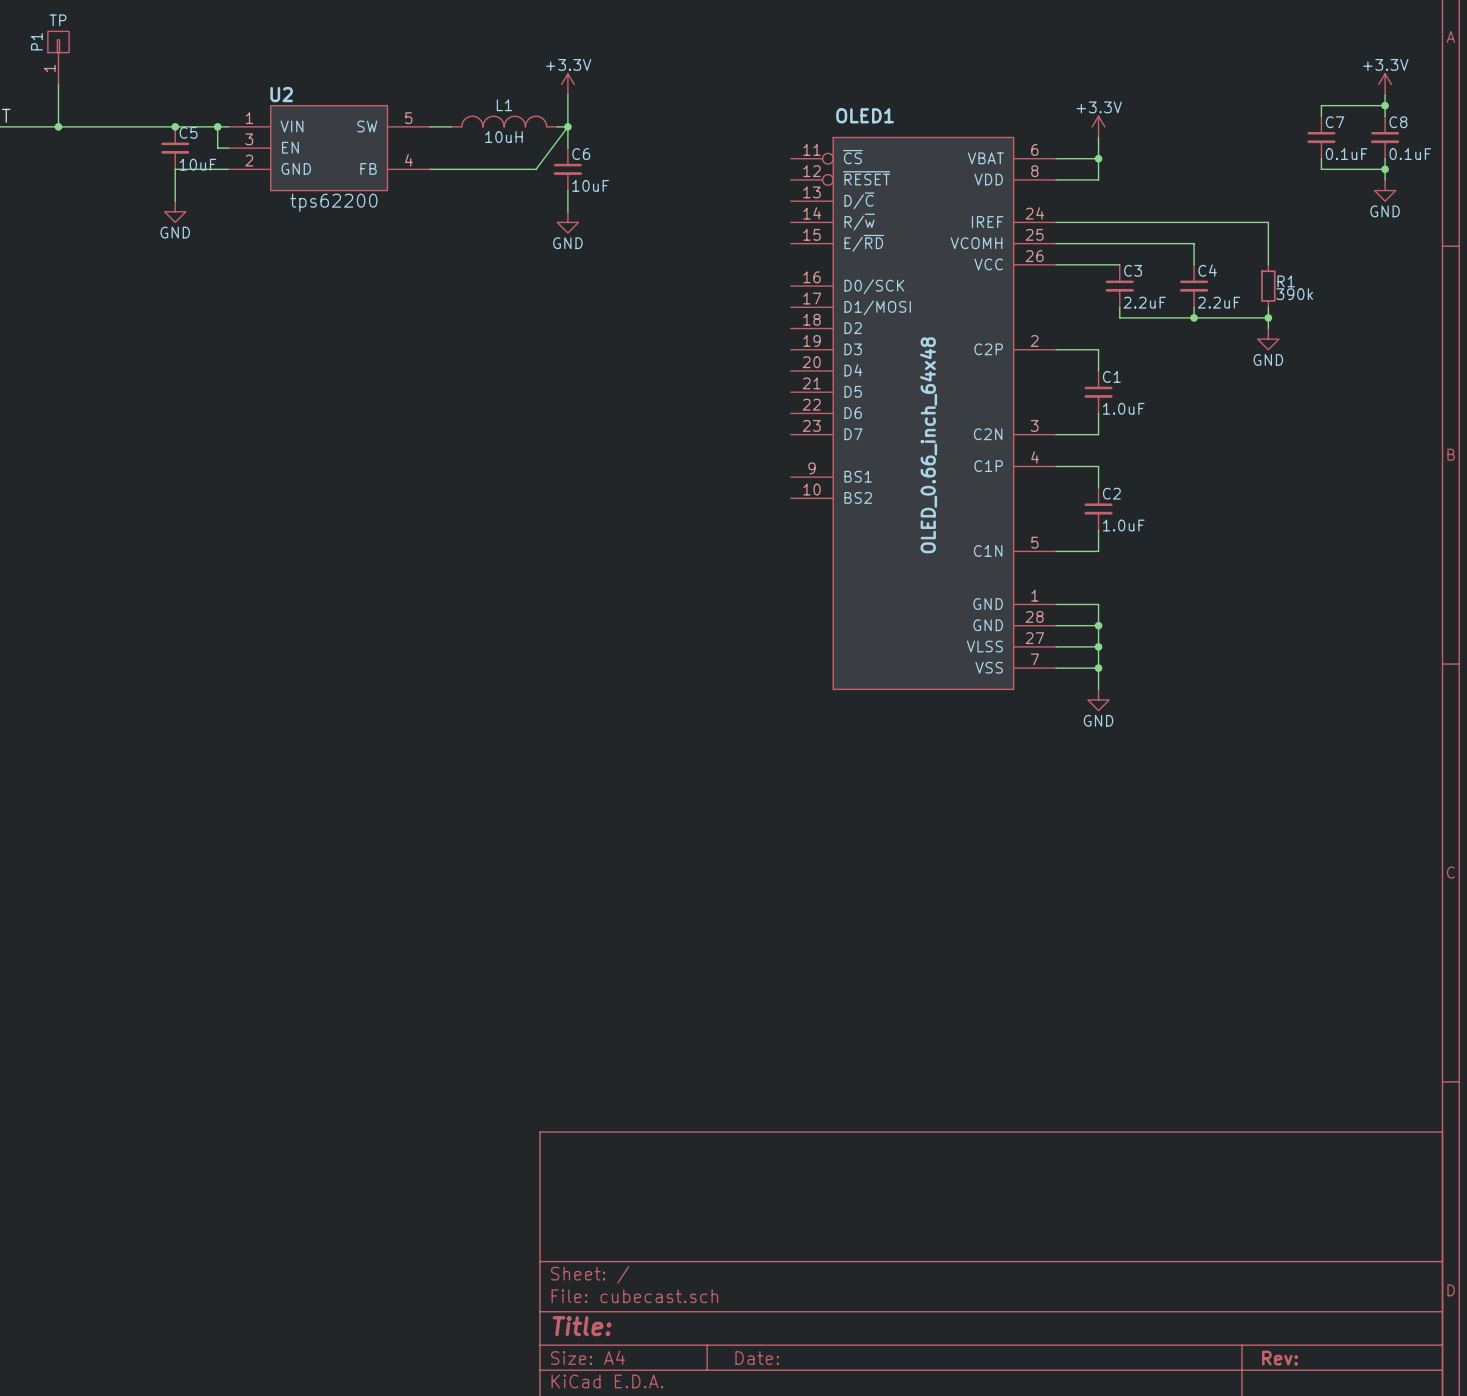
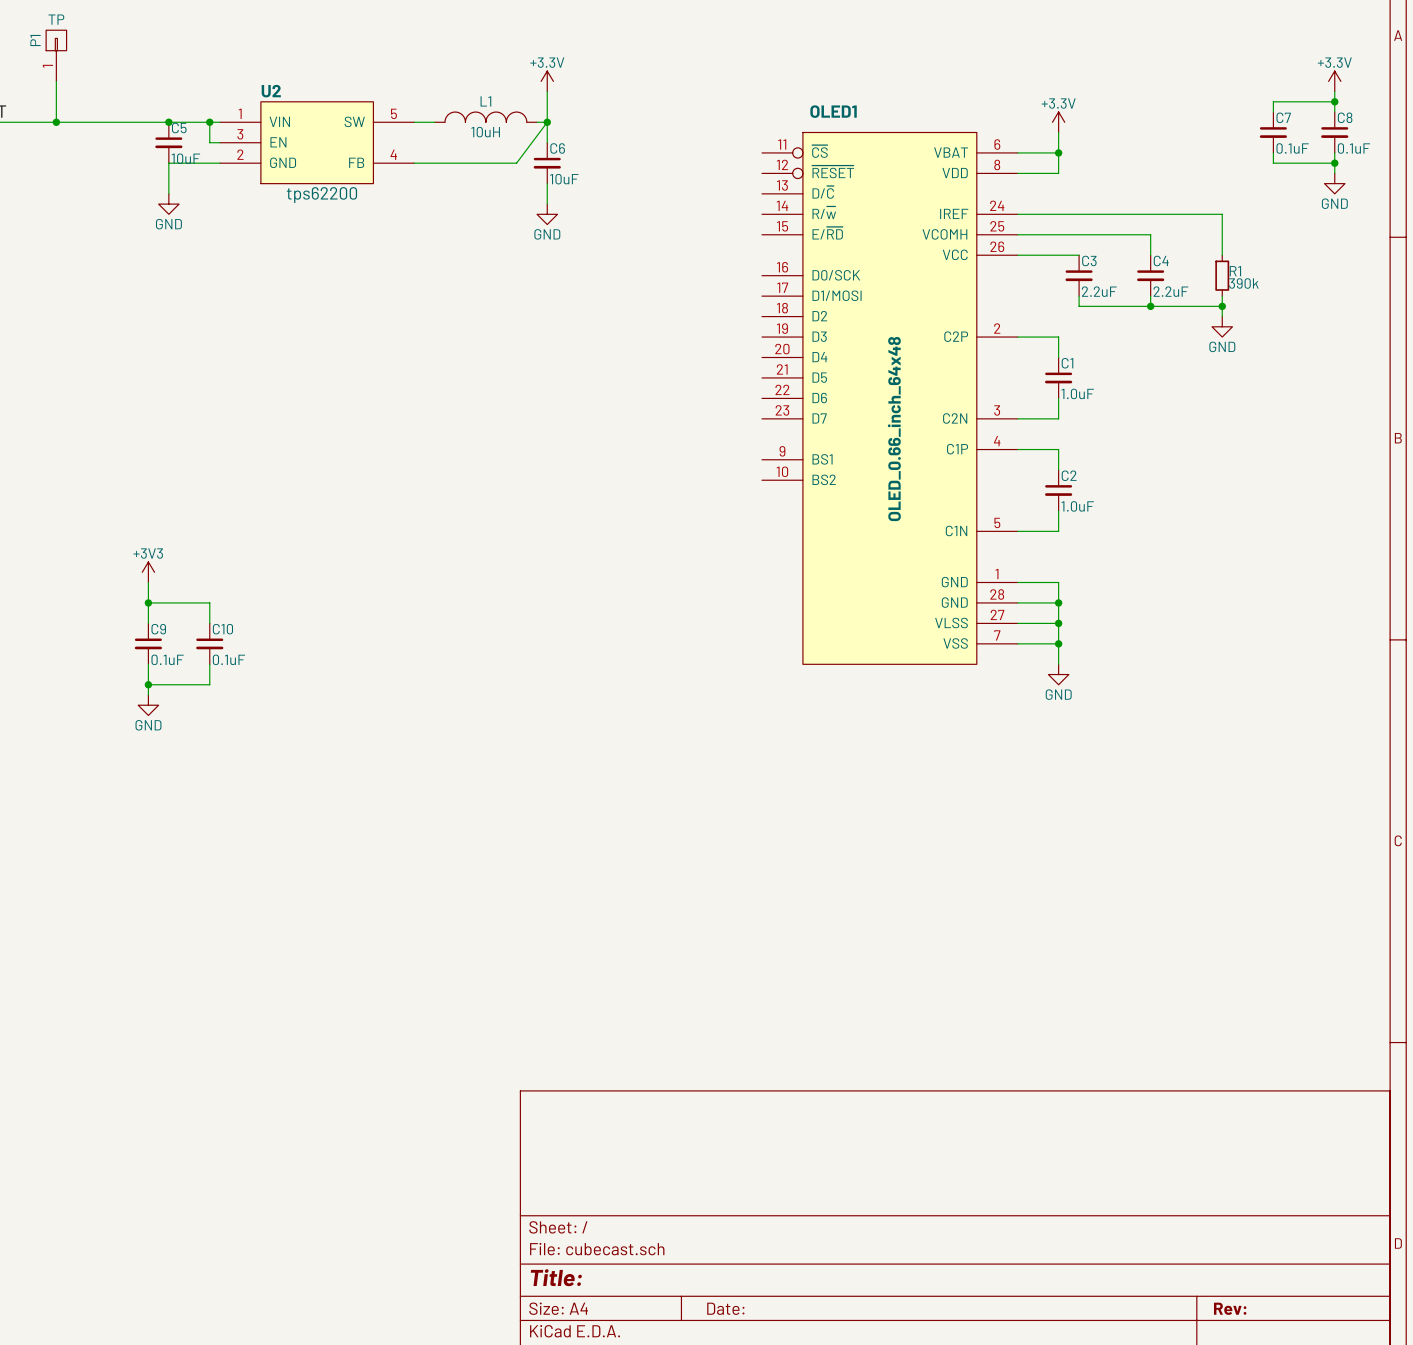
power symbol: none -> +3V3 (148, 572)
wire: none -> (148, 582) (148, 623)
wire: none -> (148, 602) (209, 602) (209, 623)
junction: none -> (148, 602)
C9: none -> 0.1uF (148, 643)
C10: none -> 0.1uF (209, 643)
wire: none -> (148, 664) (148, 694)
wire: none -> (209, 664) (209, 684) (148, 684)
junction: none -> (148, 684)
power symbol: none -> GND (148, 705)

